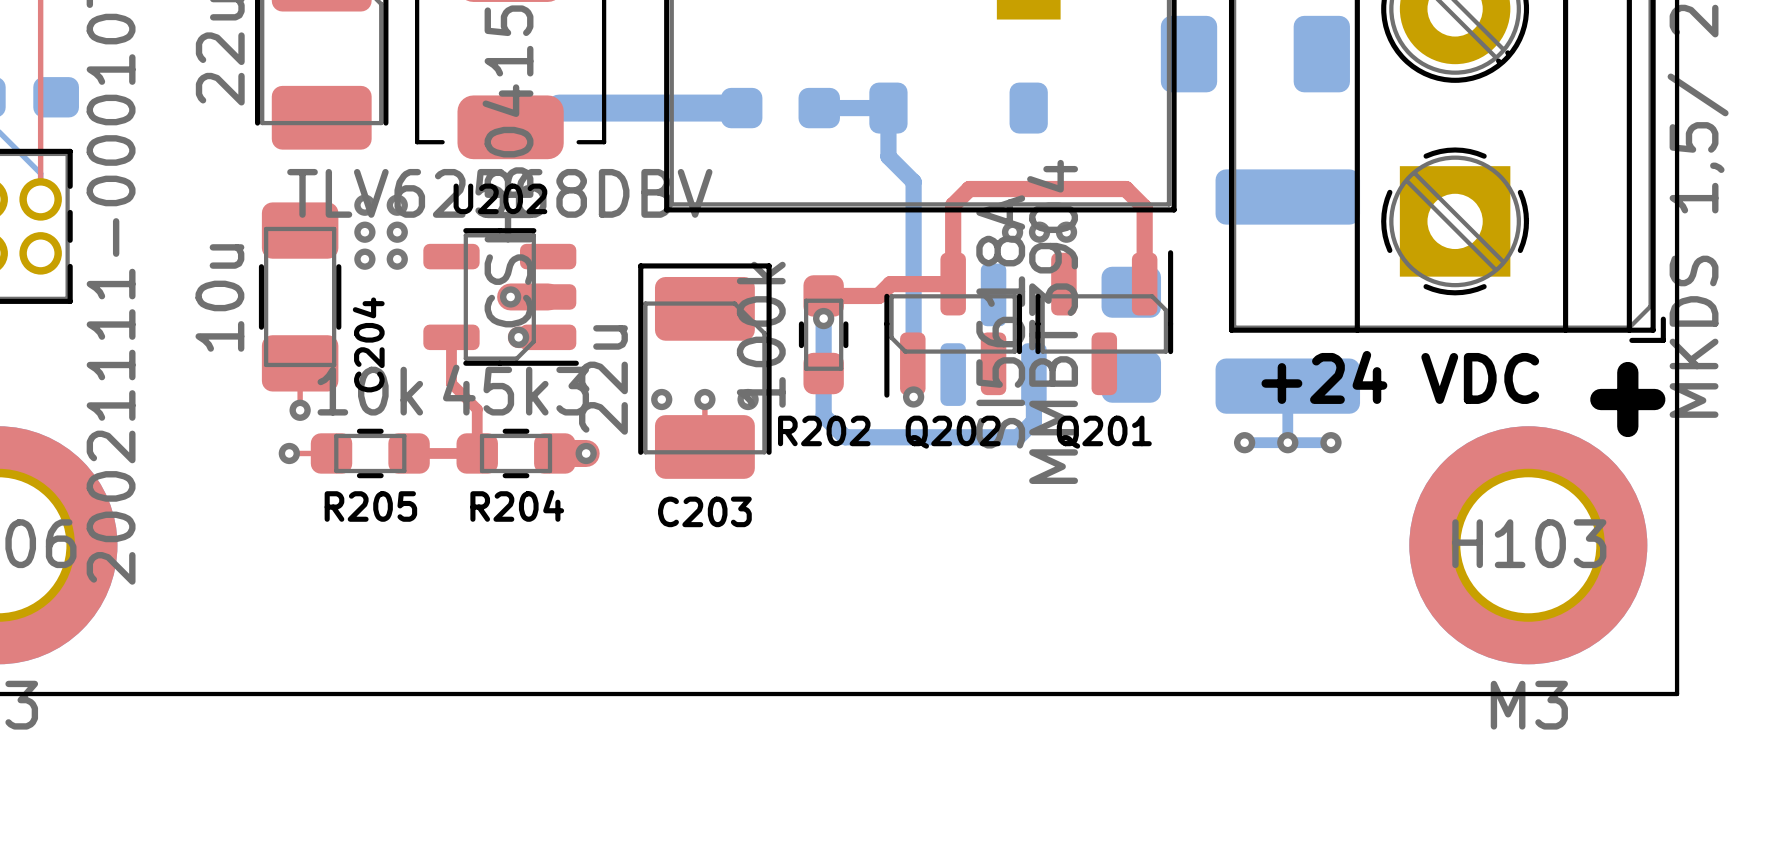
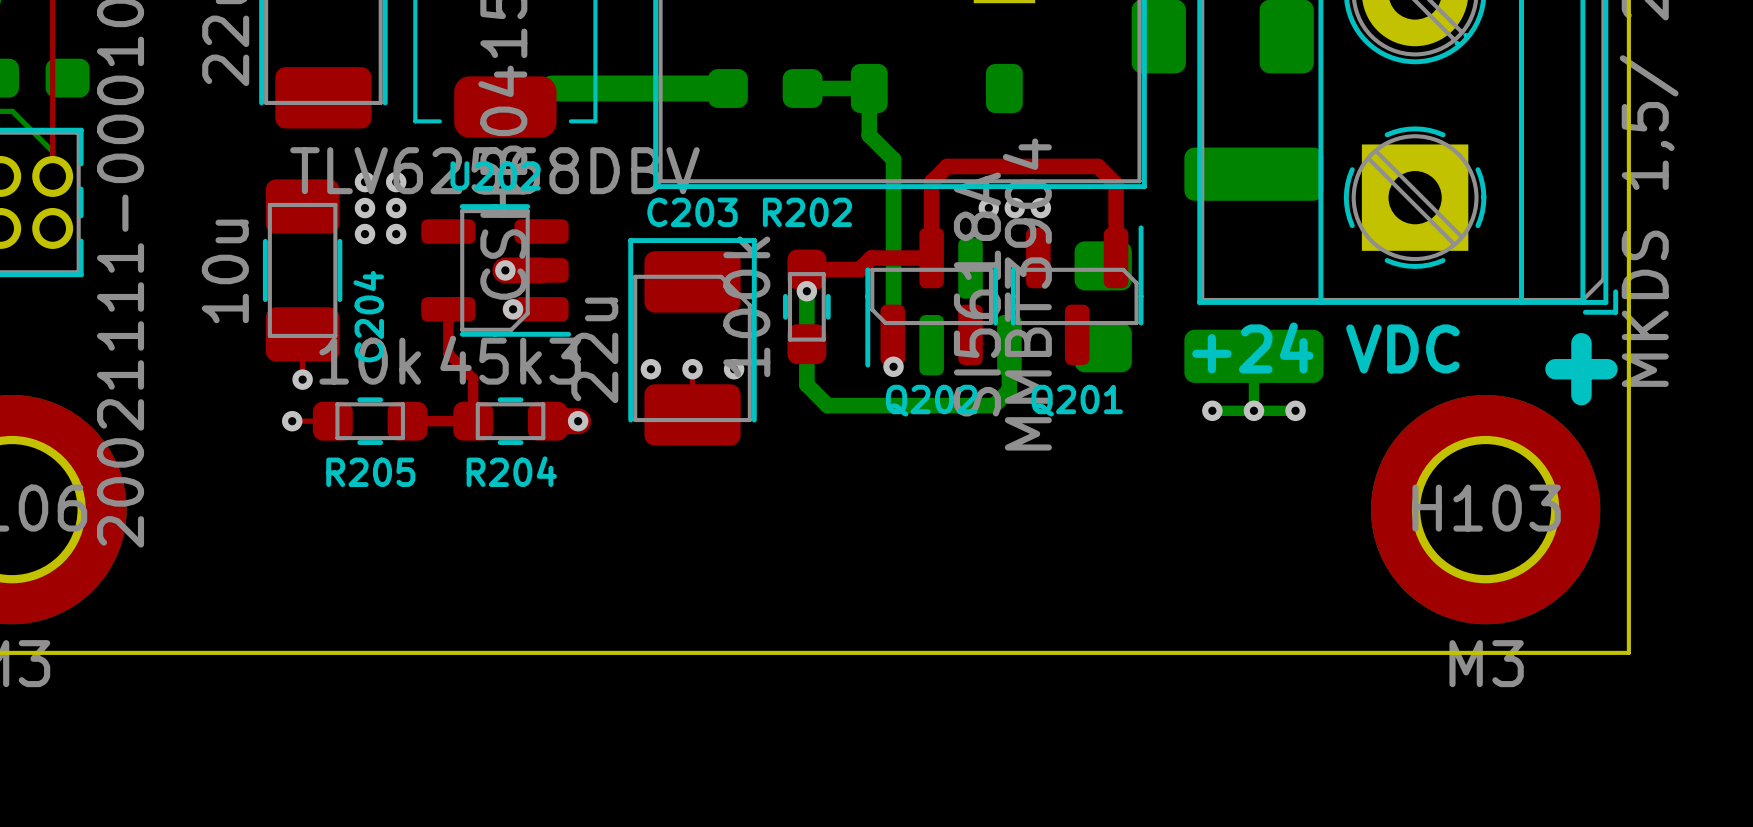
text position: +24 VDC (1400, 377) -> +24 VDC (1325, 347)
R202 name position: R202 (824, 430) -> R202 (807, 212)
C203 name position: C203 (704, 511) -> C203 (692, 212)

